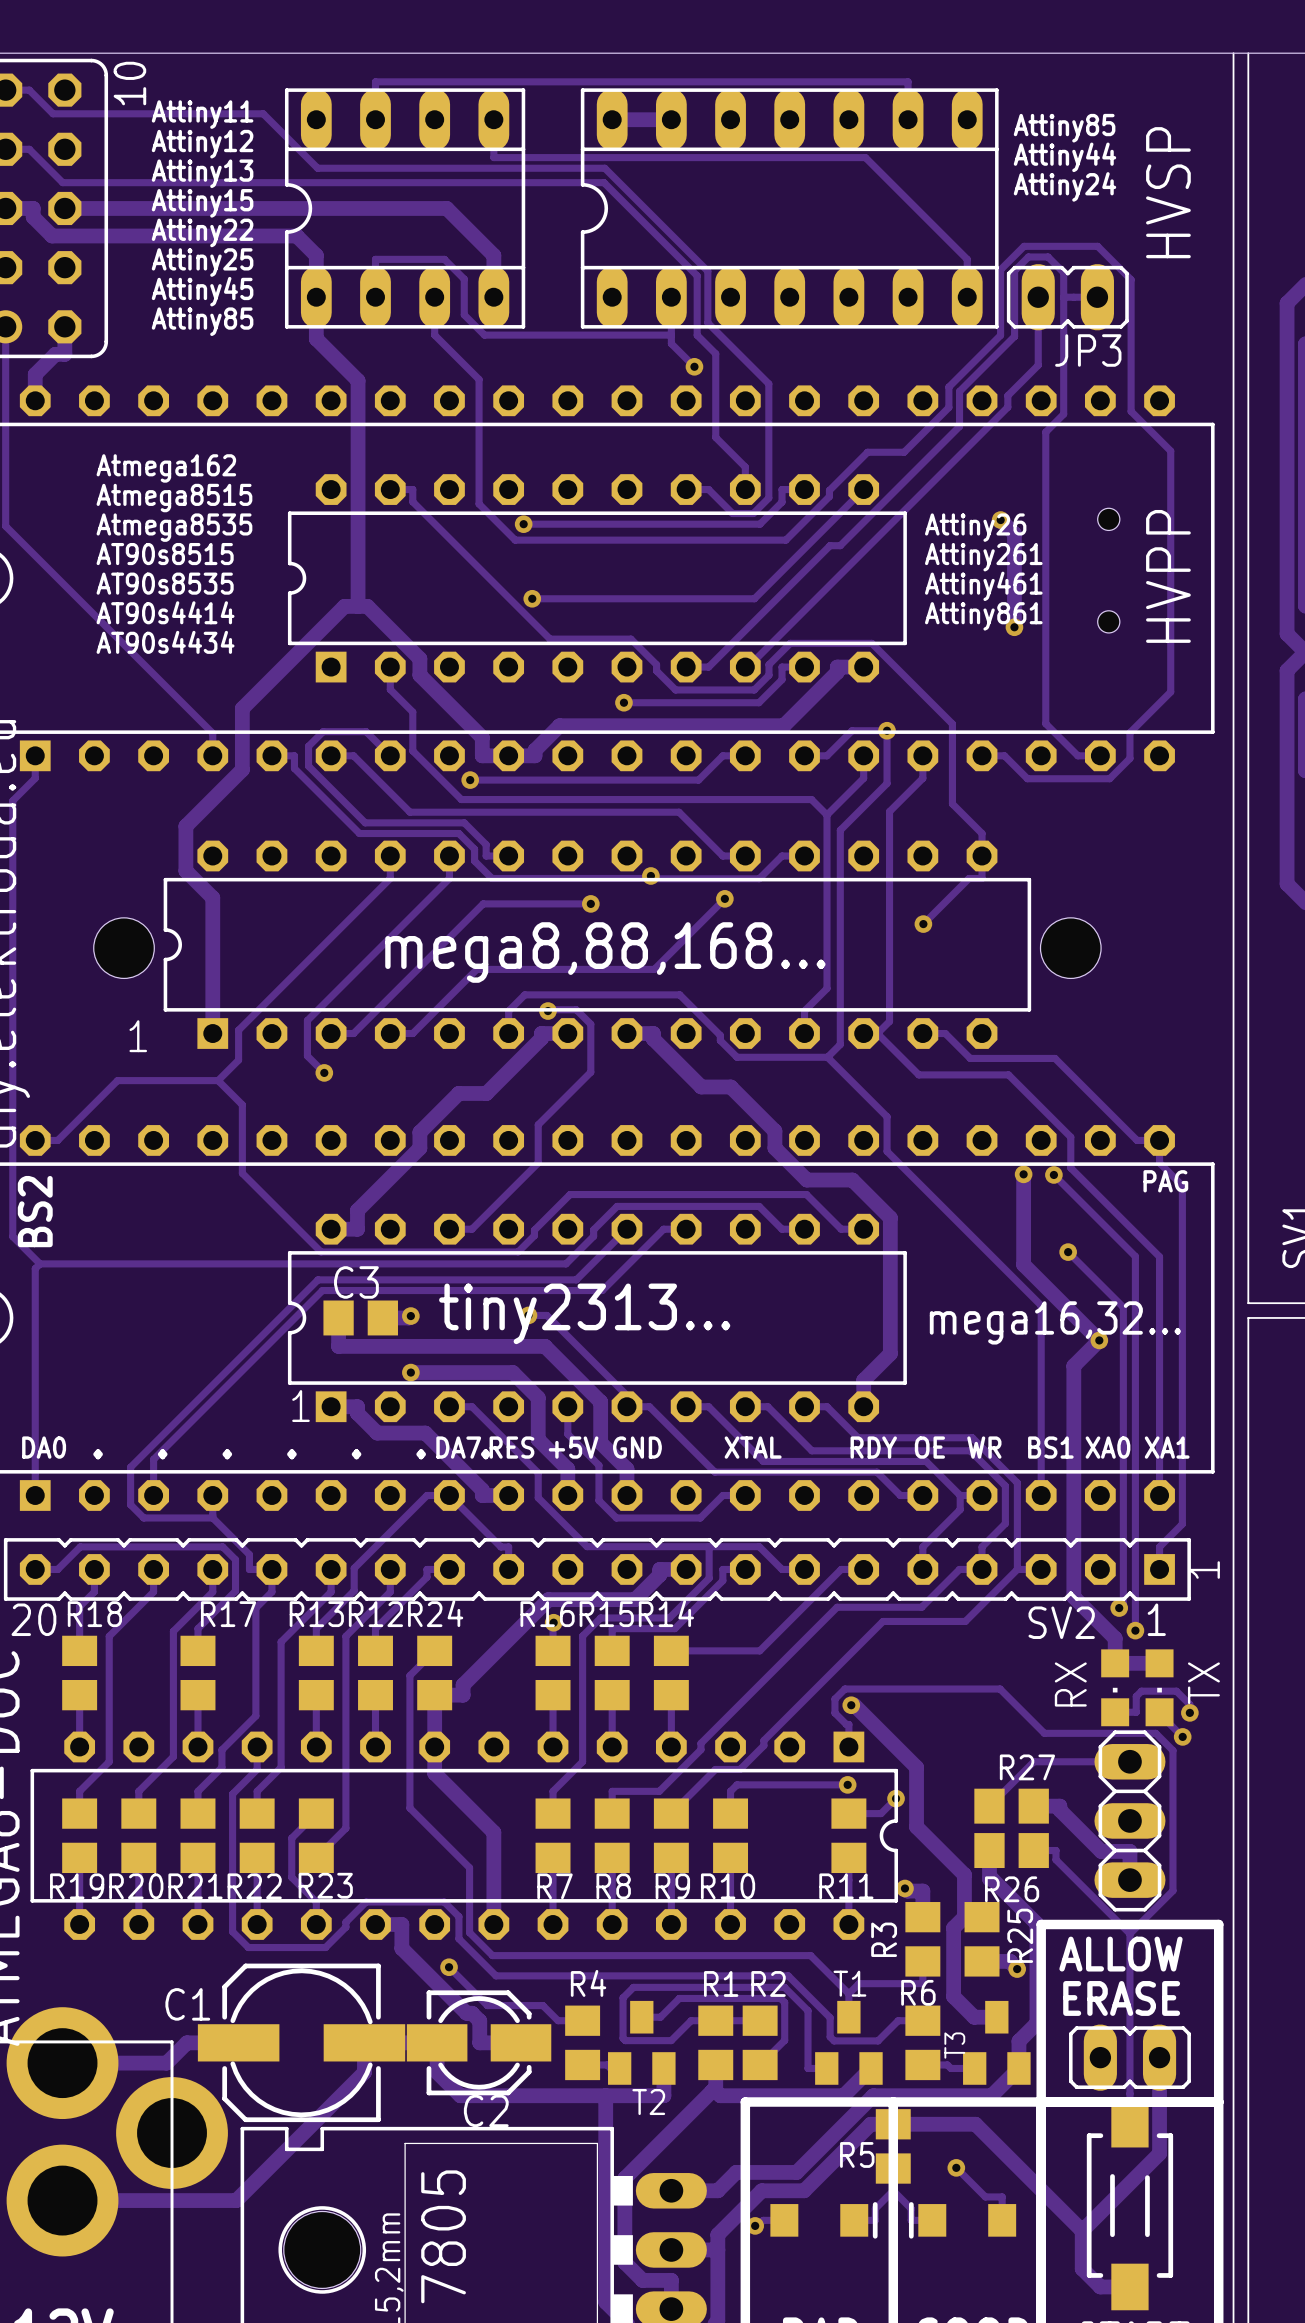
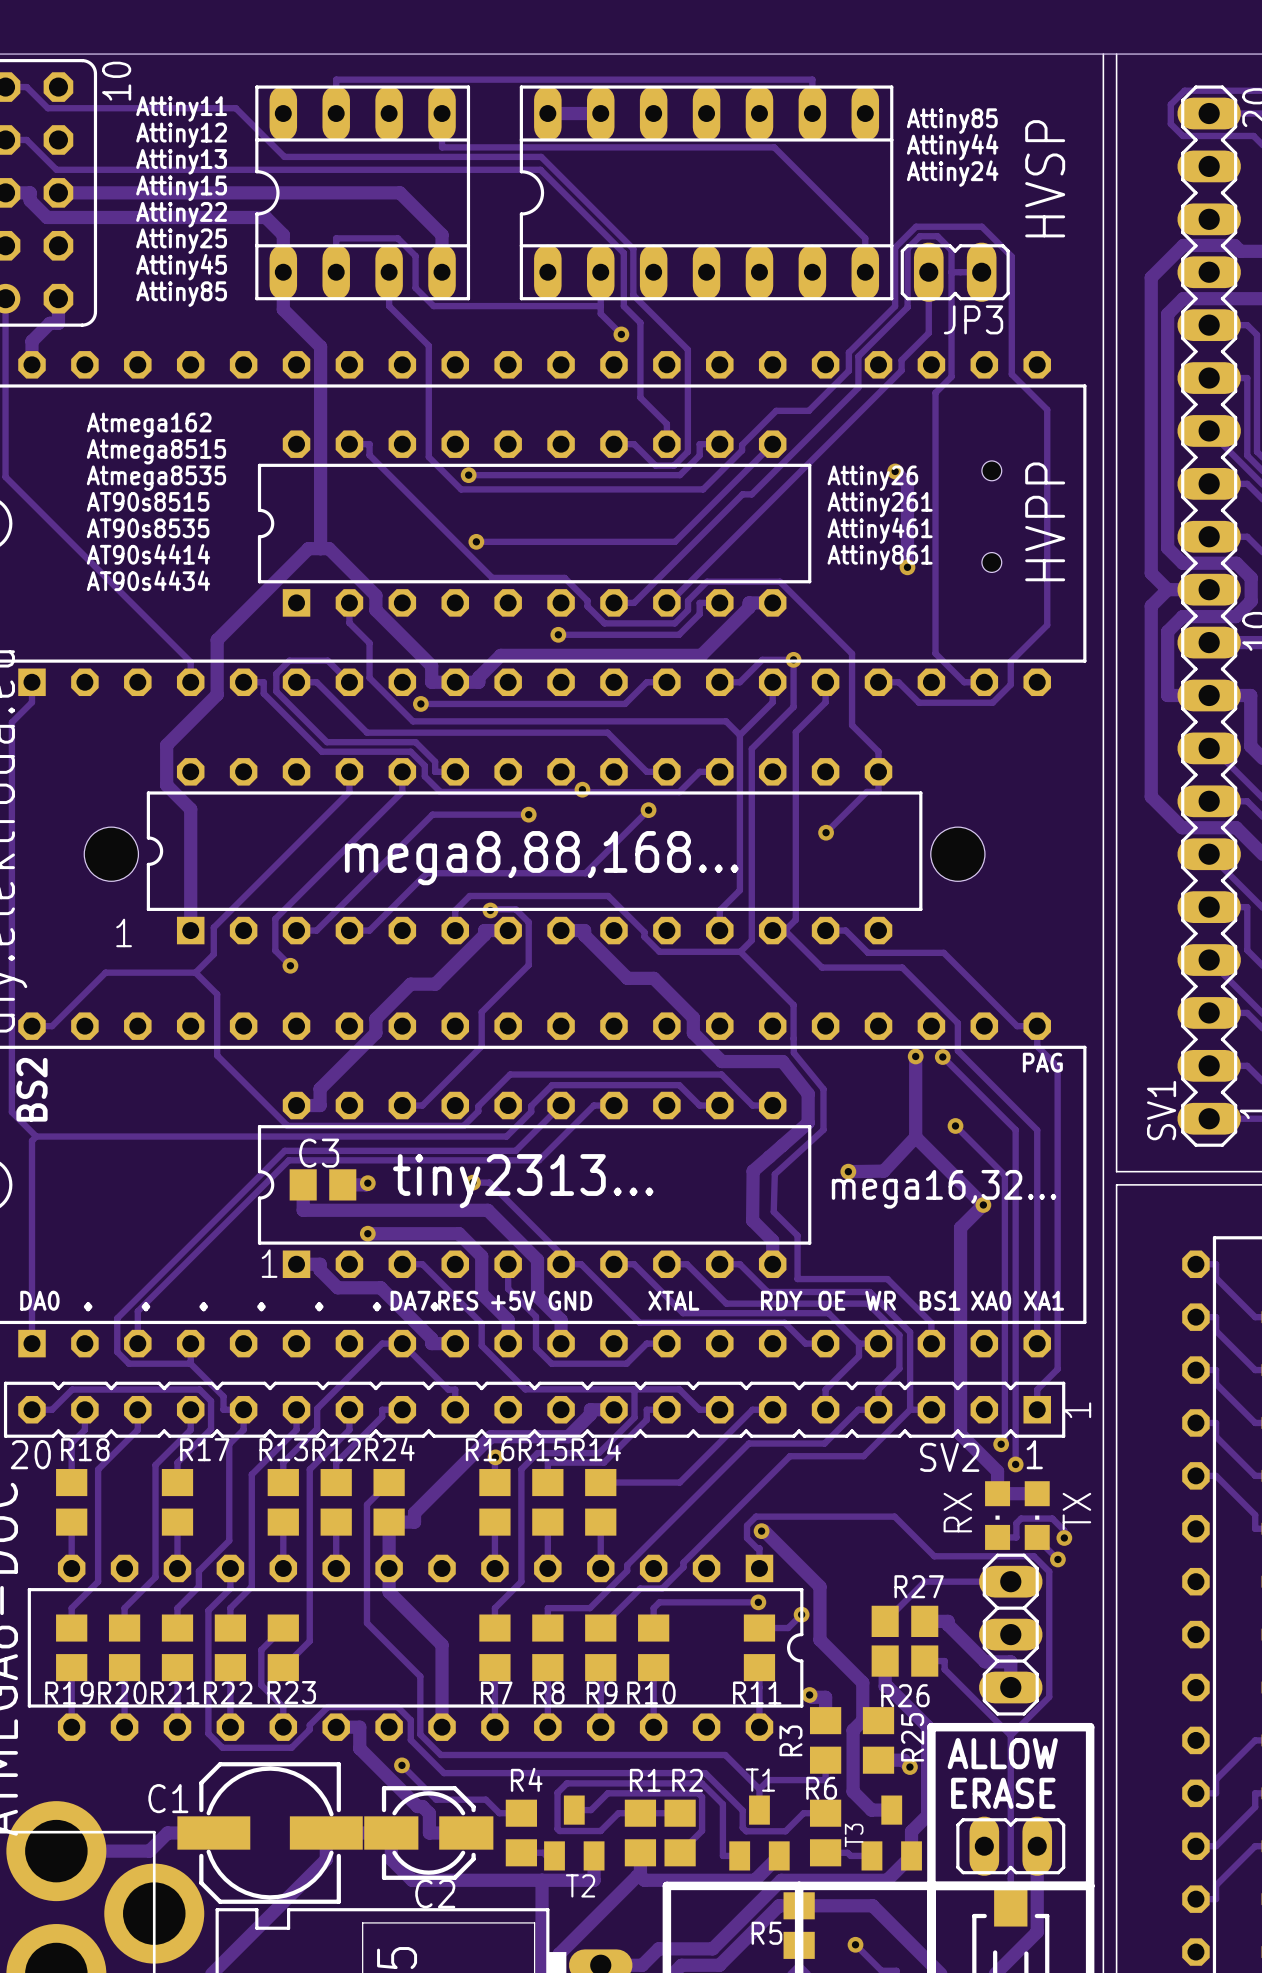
track: (887, 1151) (1041, 1305) (1041, 1472) -> (793, 1035) (793, 1052) (823, 1089) (823, 1129) (774, 1174) (773, 1211) (797, 1235) (797, 1279) (887, 1279) (931, 1322)
track: (852, 1180) (890, 1217) (890, 1353) (863, 1380) -> (762, 1061) (782, 1061) (808, 1093) (808, 1122) (753, 1171) (752, 1220) (772, 1240)
track: none -> (915, 1137) (883, 1171) (848, 1171)
via: none -> (848, 1171)

